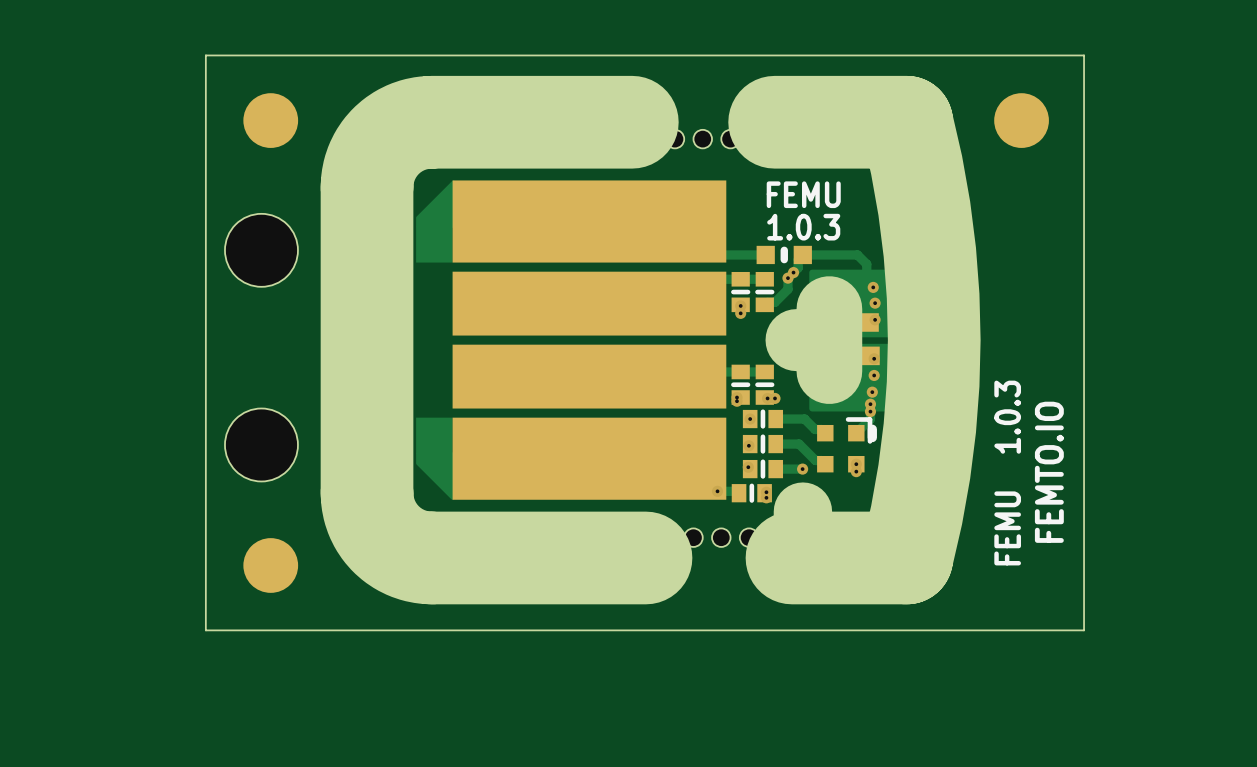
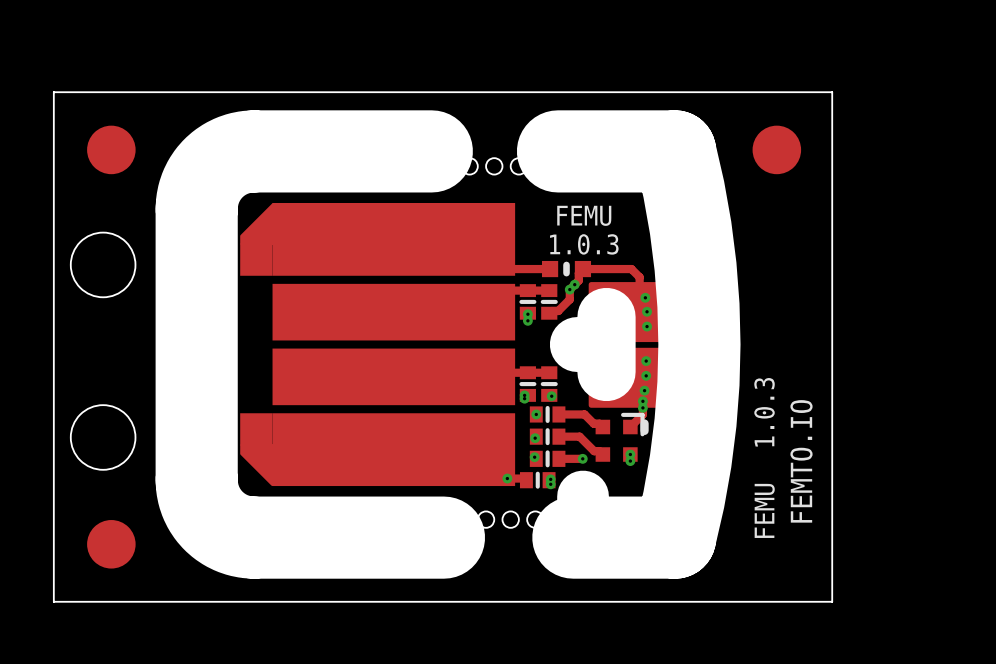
via: (774, 398) -> none

